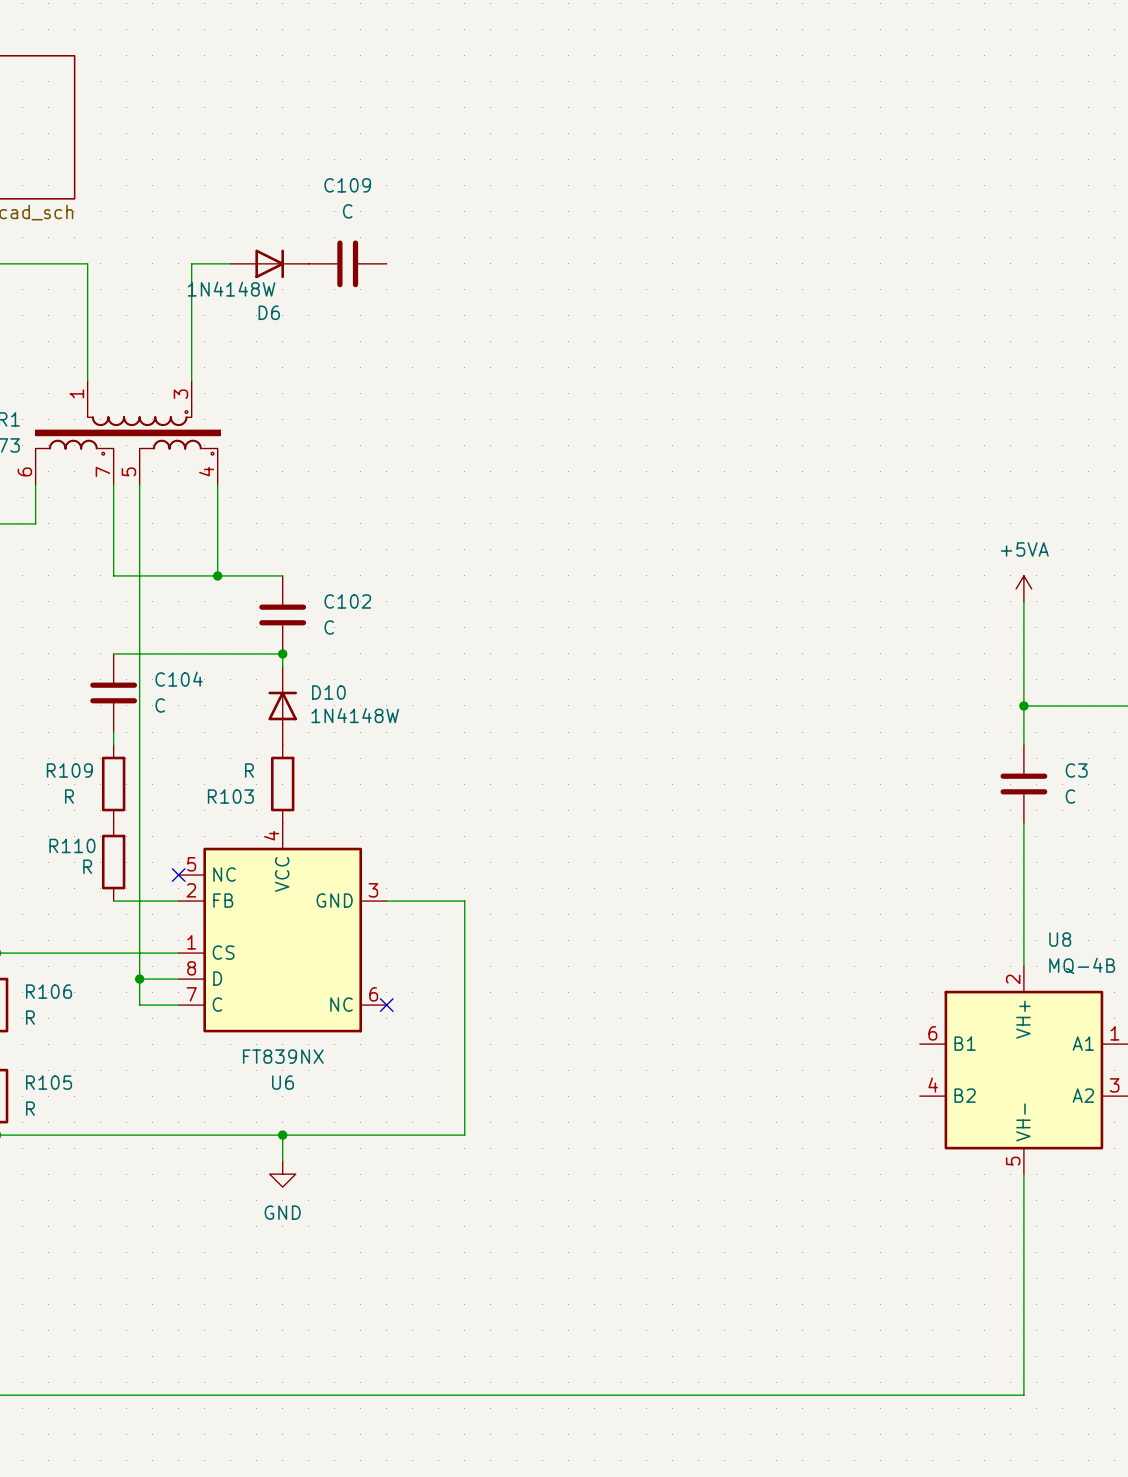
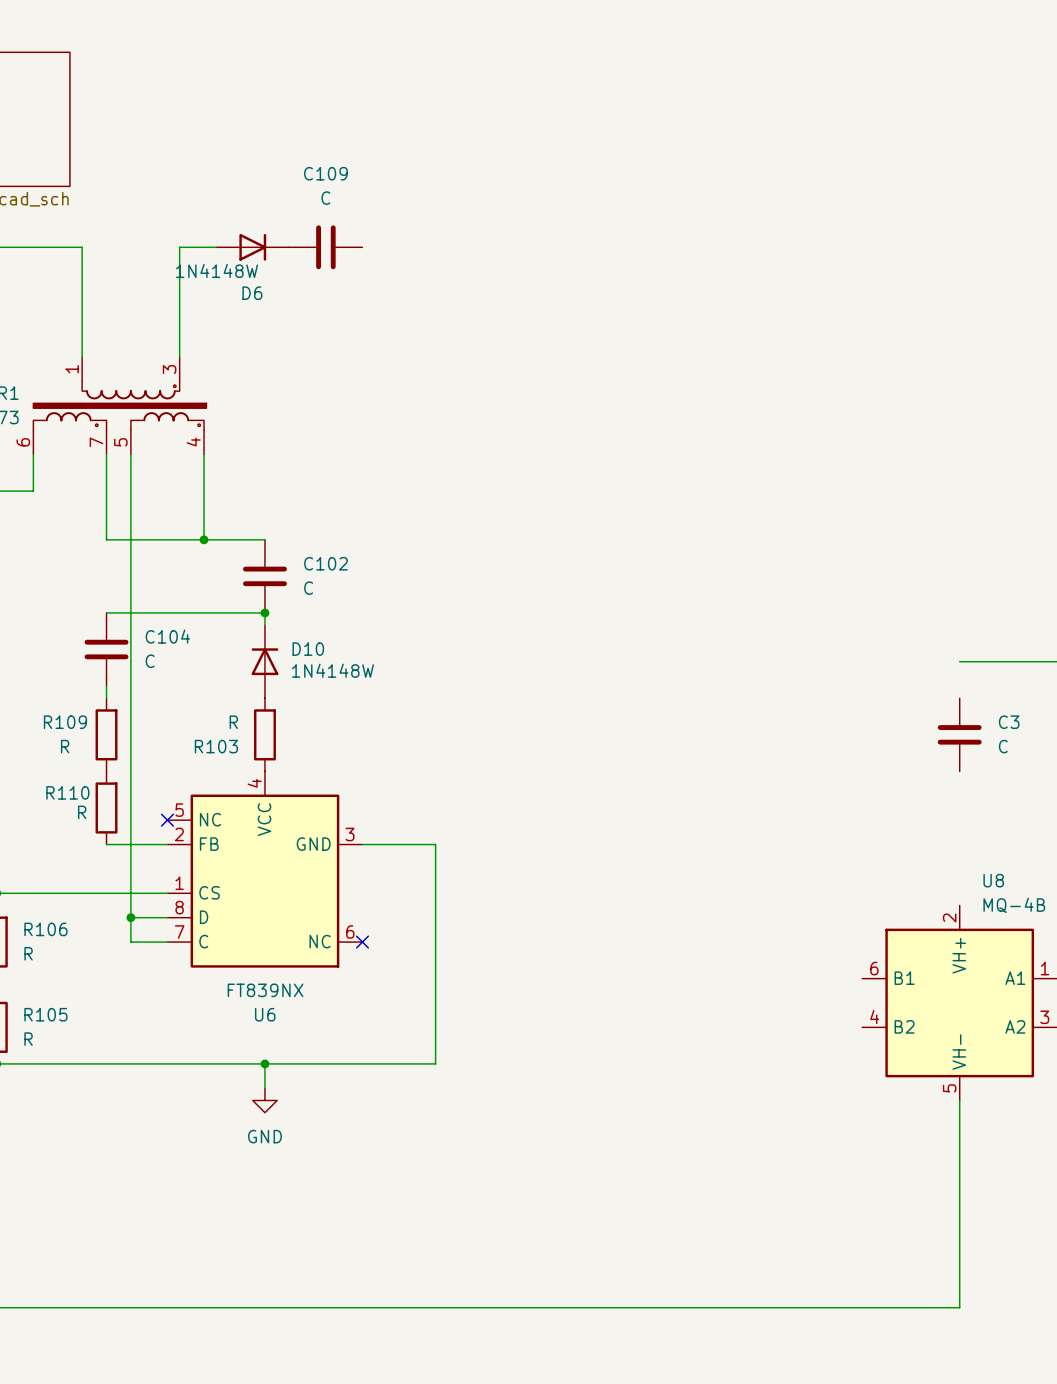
power symbol: +5VA (1023, 588) -> none
wire: (1023, 601) (1023, 745) -> none
junction: (1023, 705) -> none
wire: (1023, 823) (1023, 966) -> none

